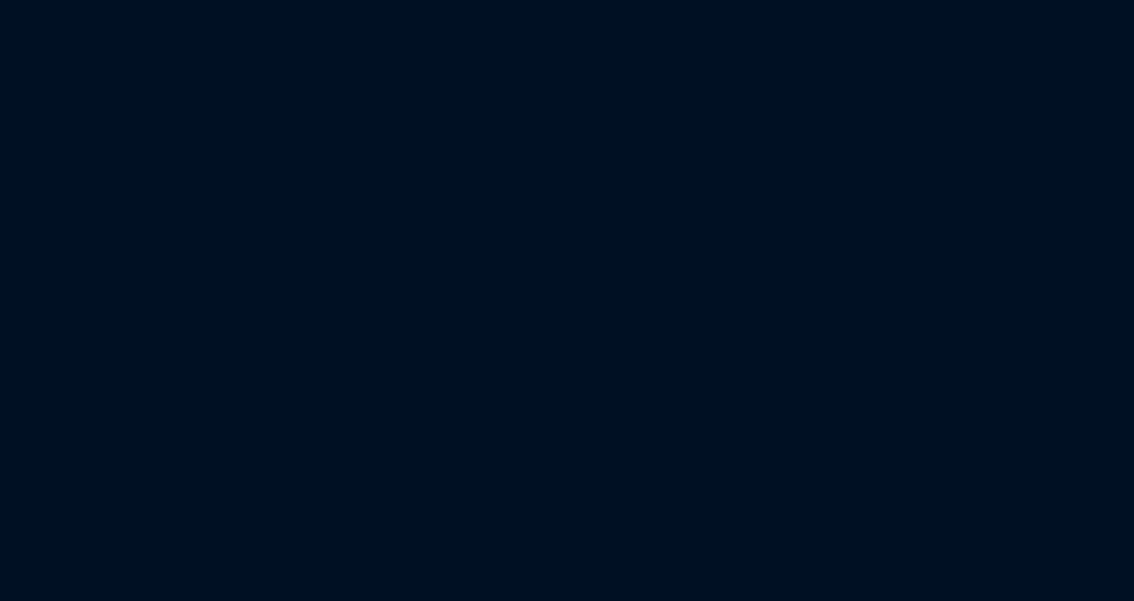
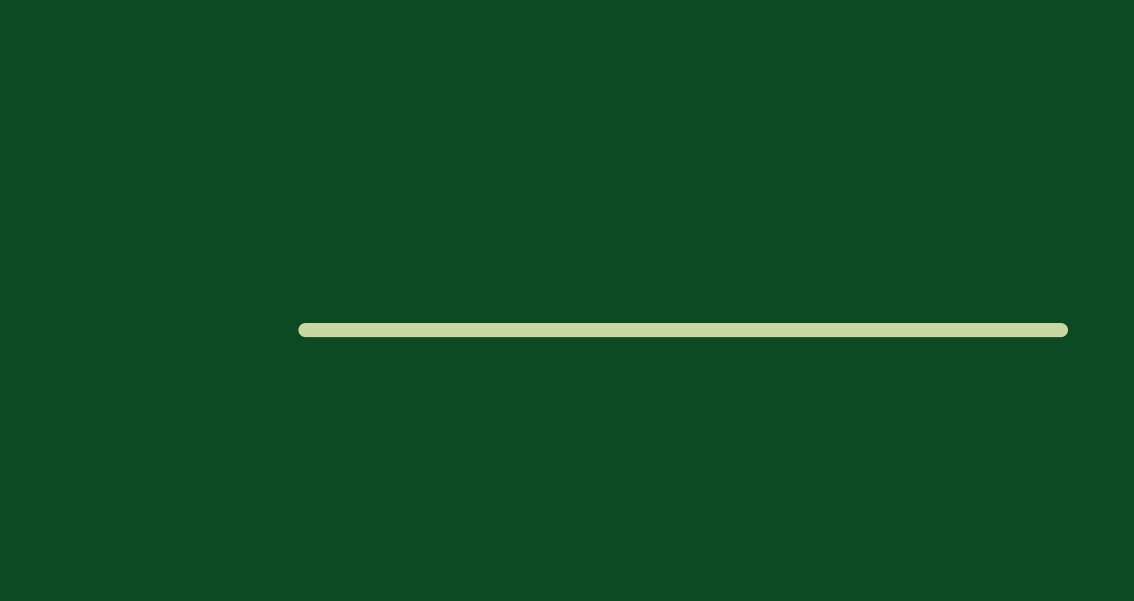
board edge: none -> (1060, 330) (305, 330)

